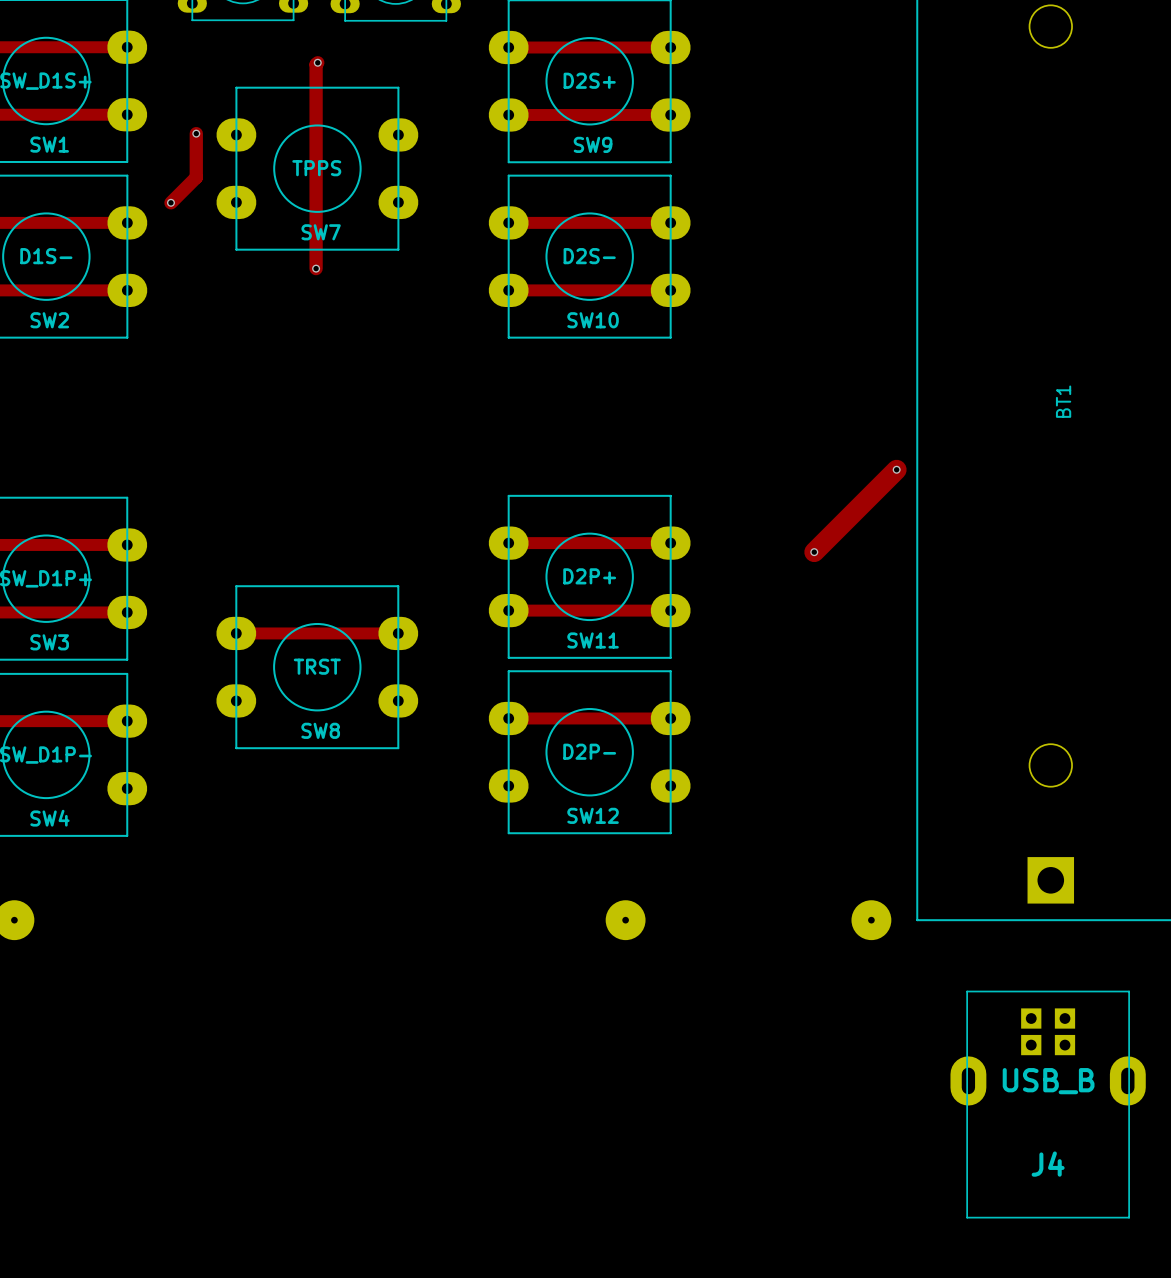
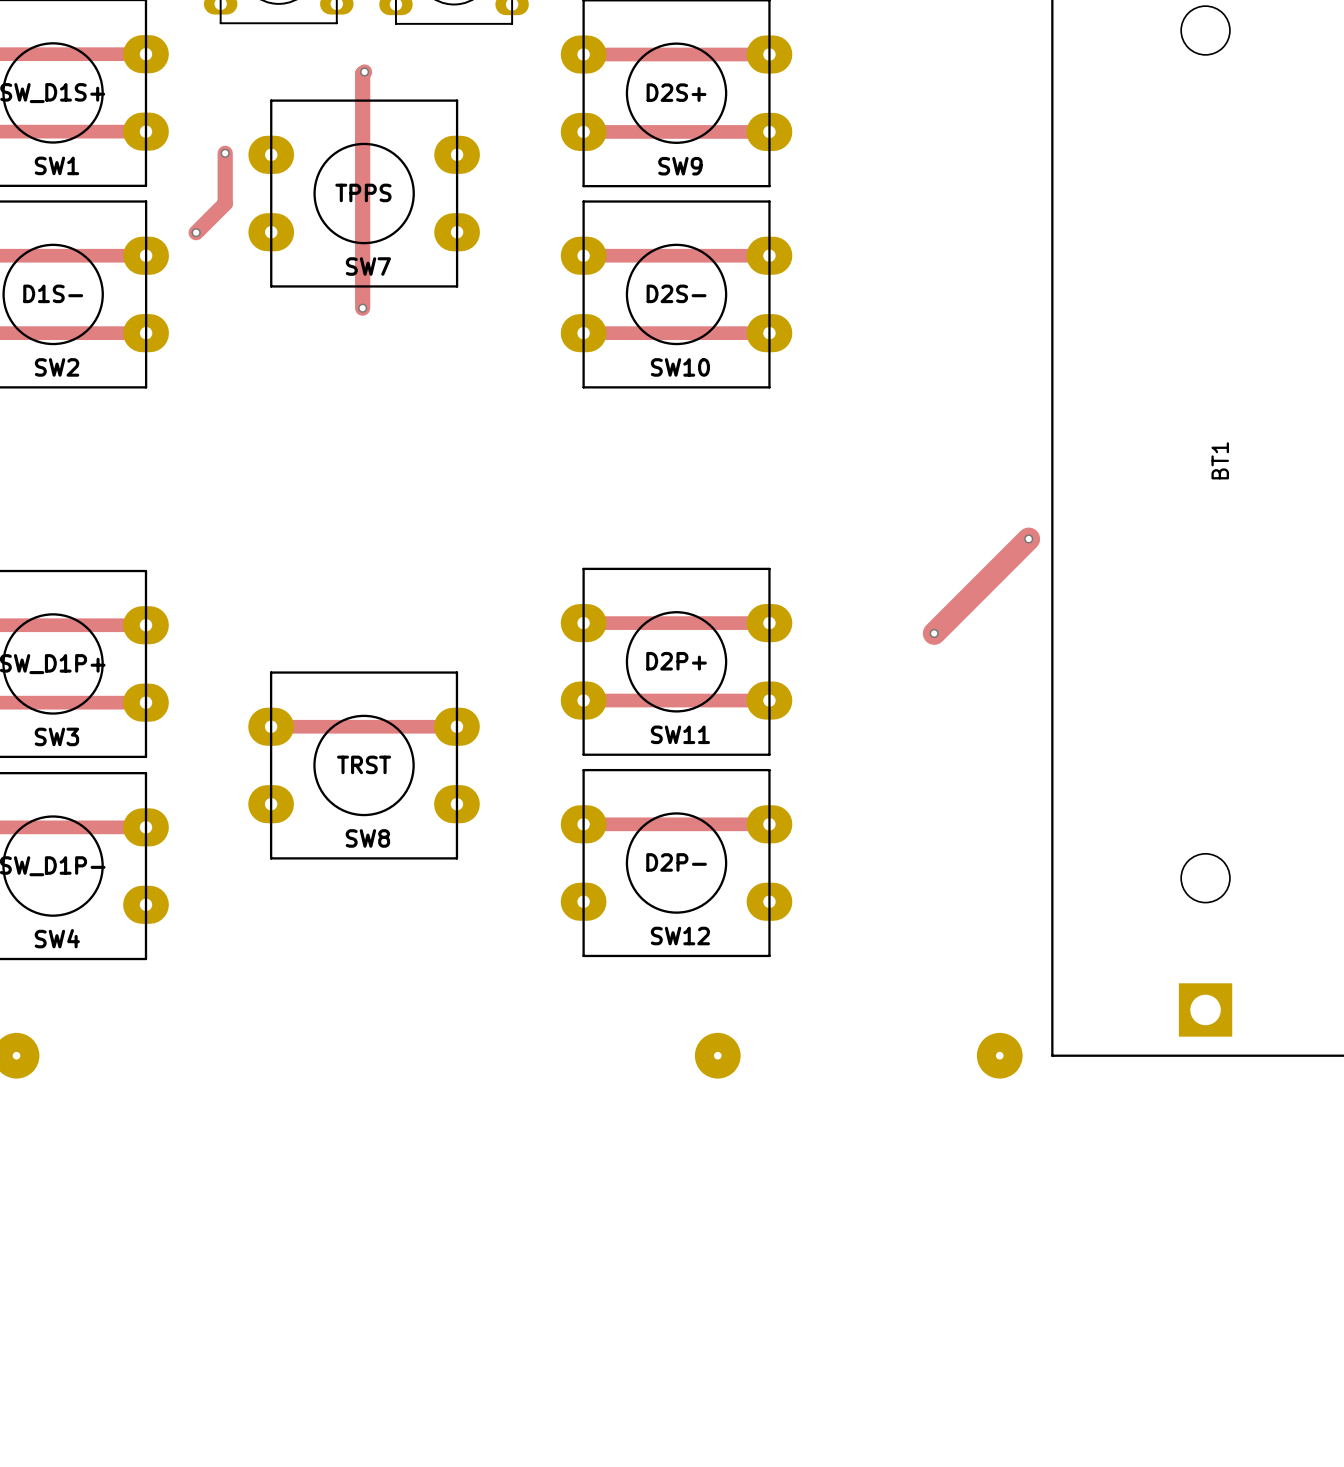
J4: USB_B (1048, 1104) -> none

